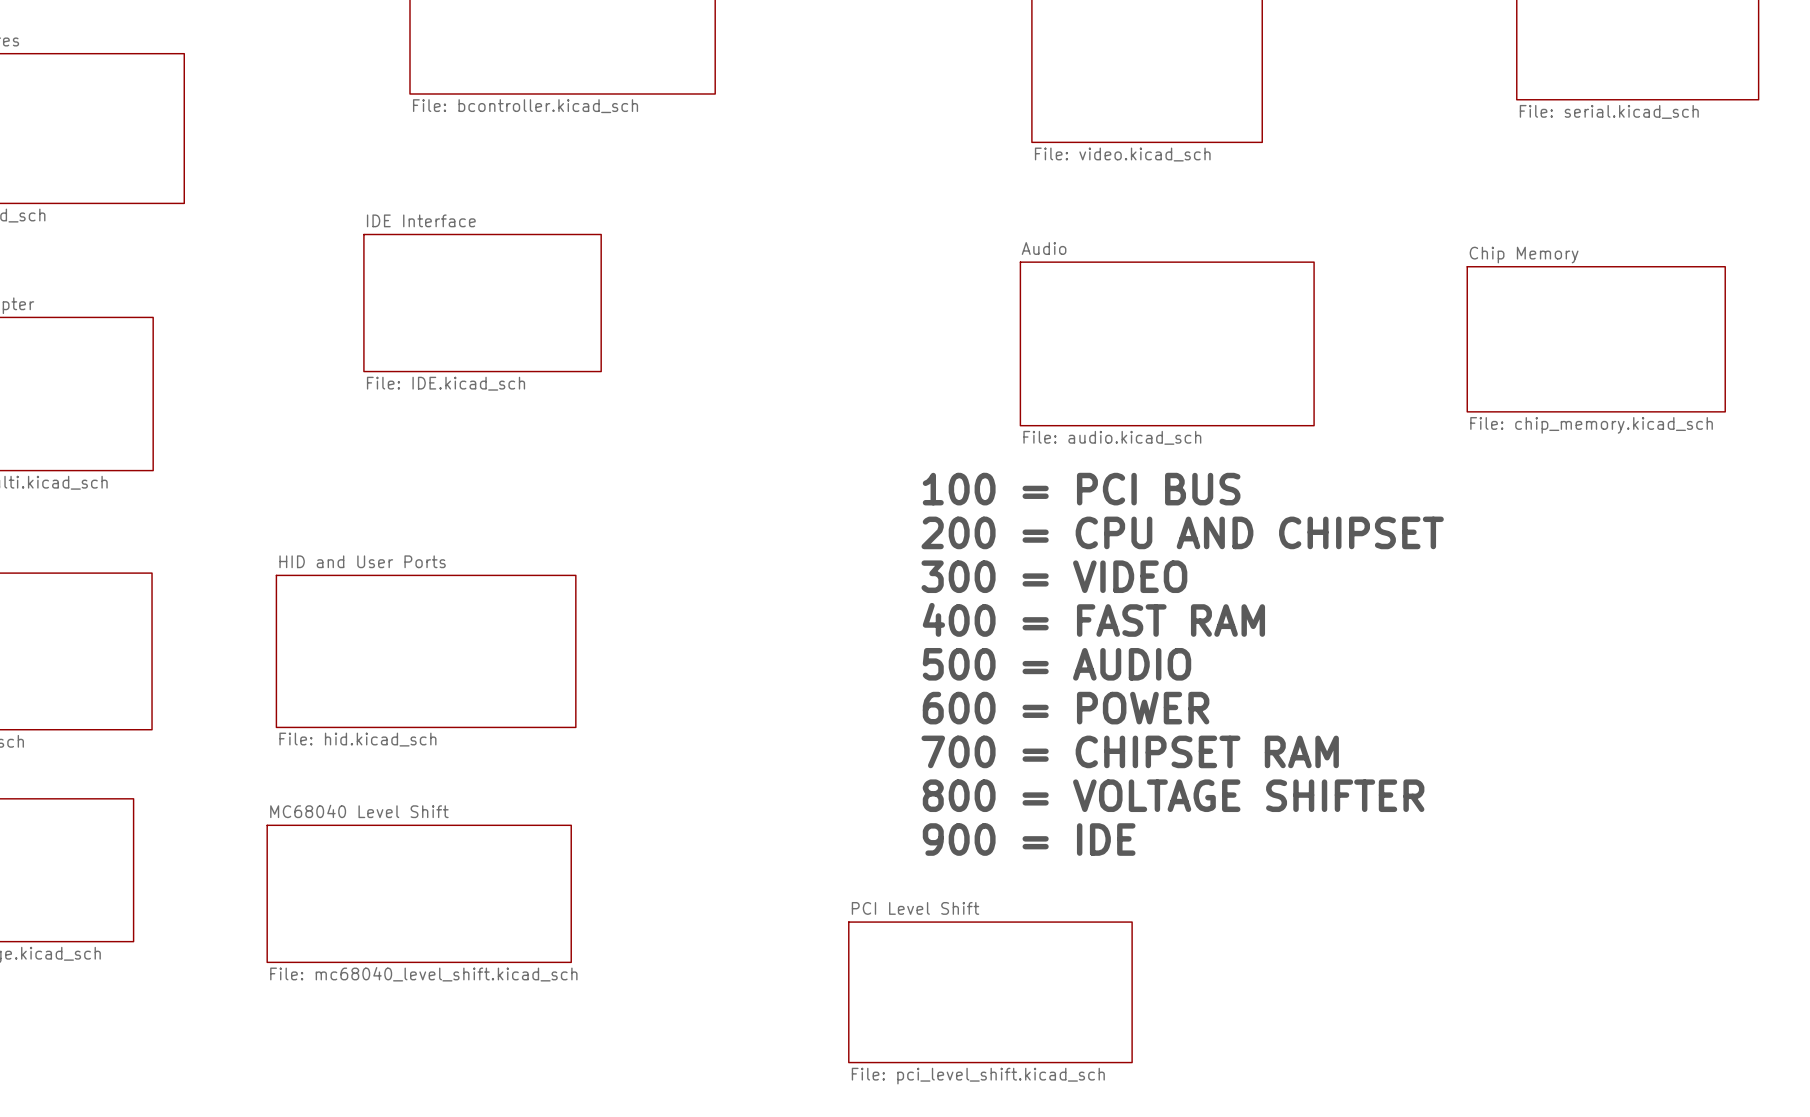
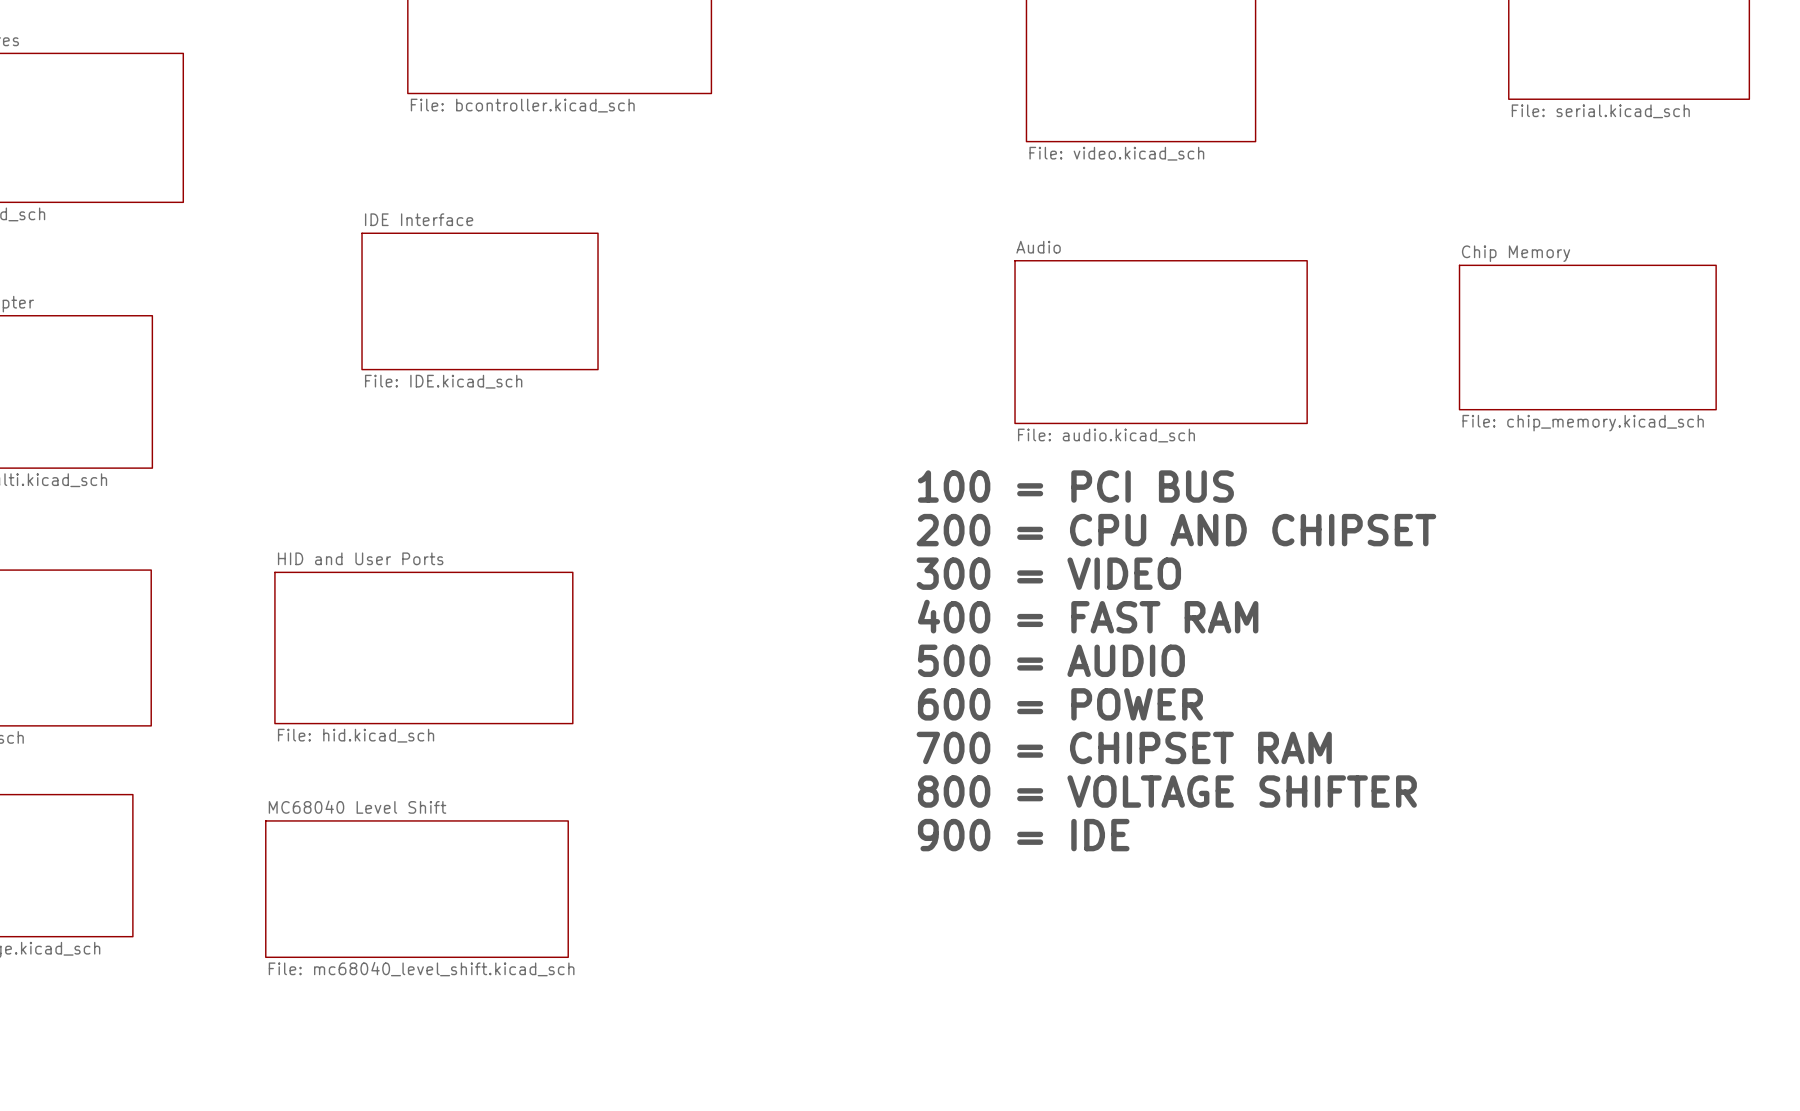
sheet PCI Level Shift: File: pci_level_shift.kicad_sch (990, 992) -> none

